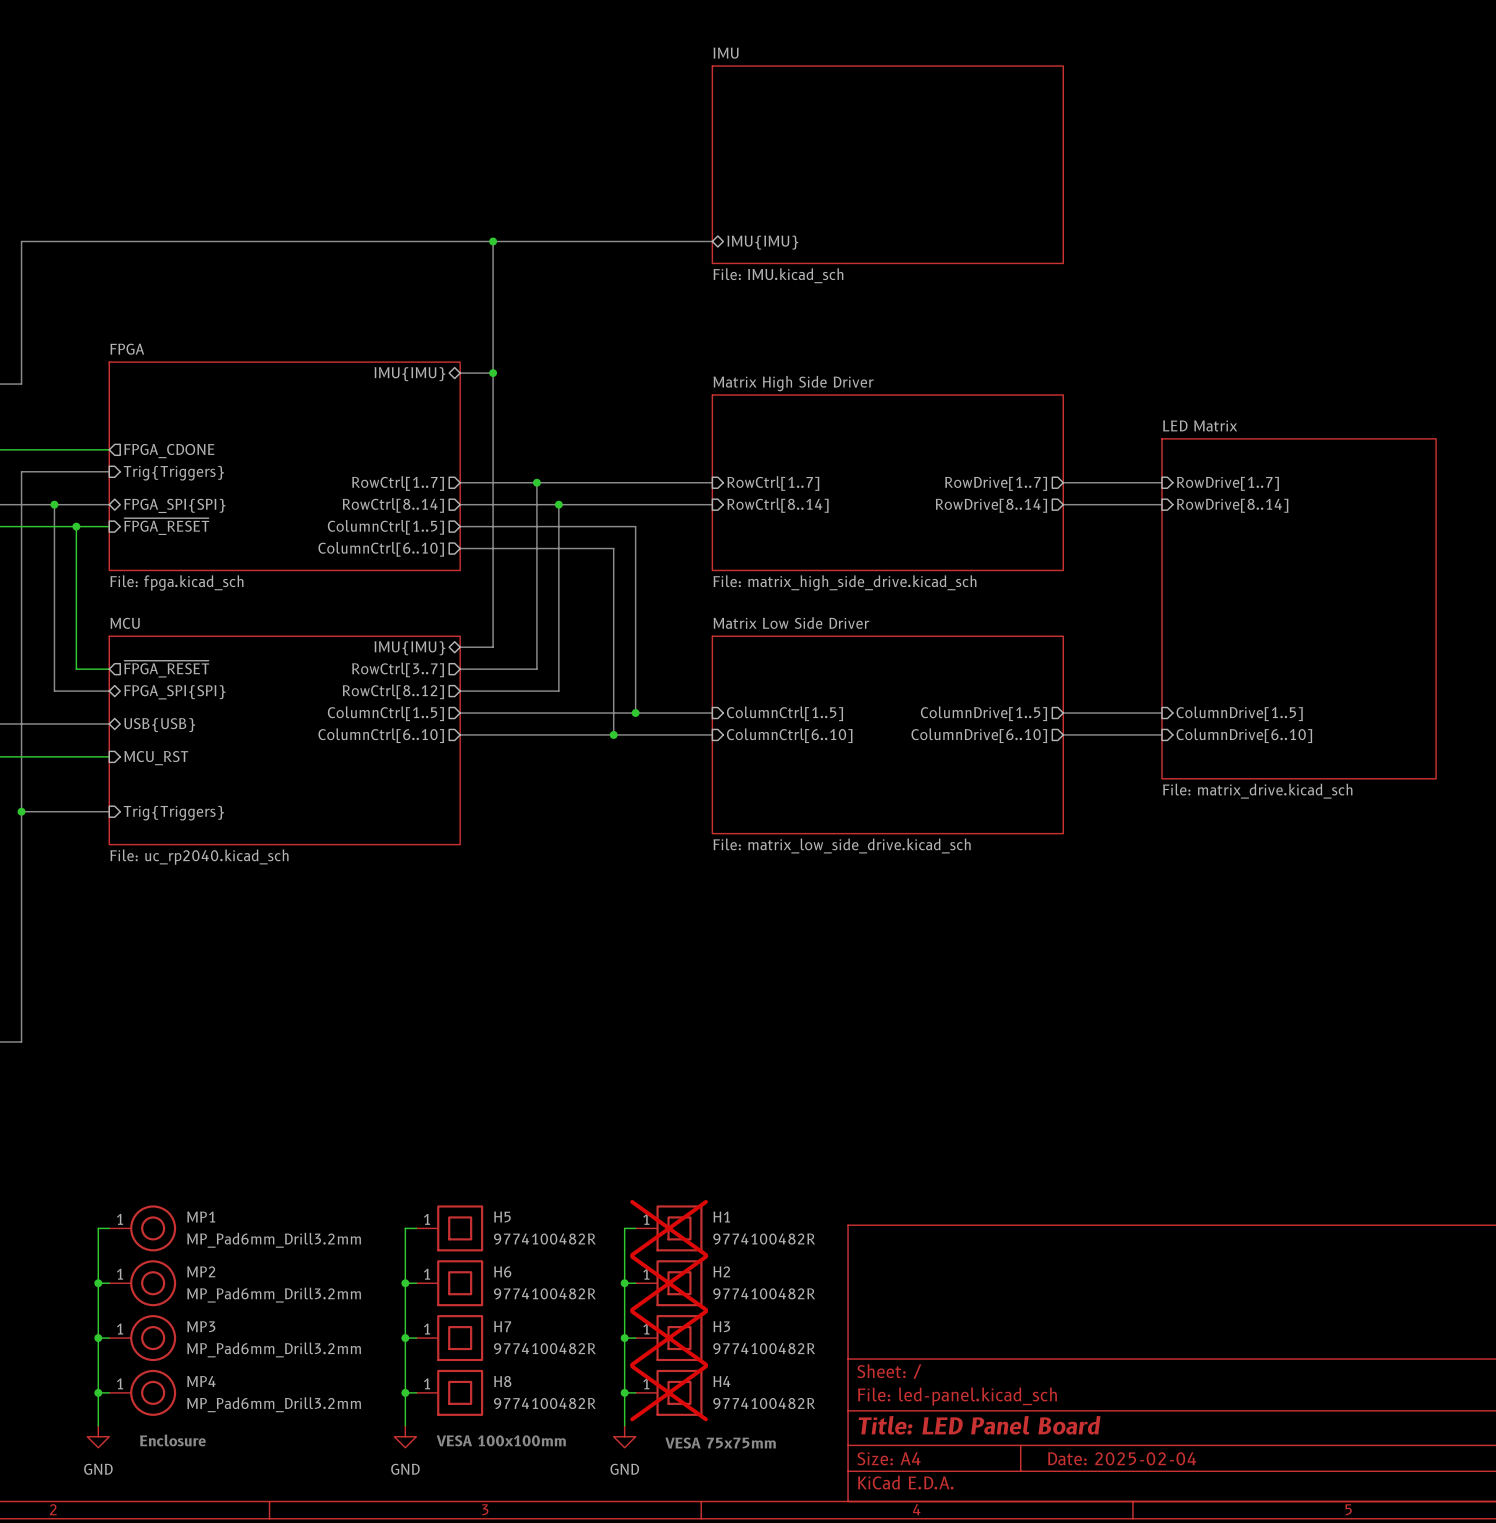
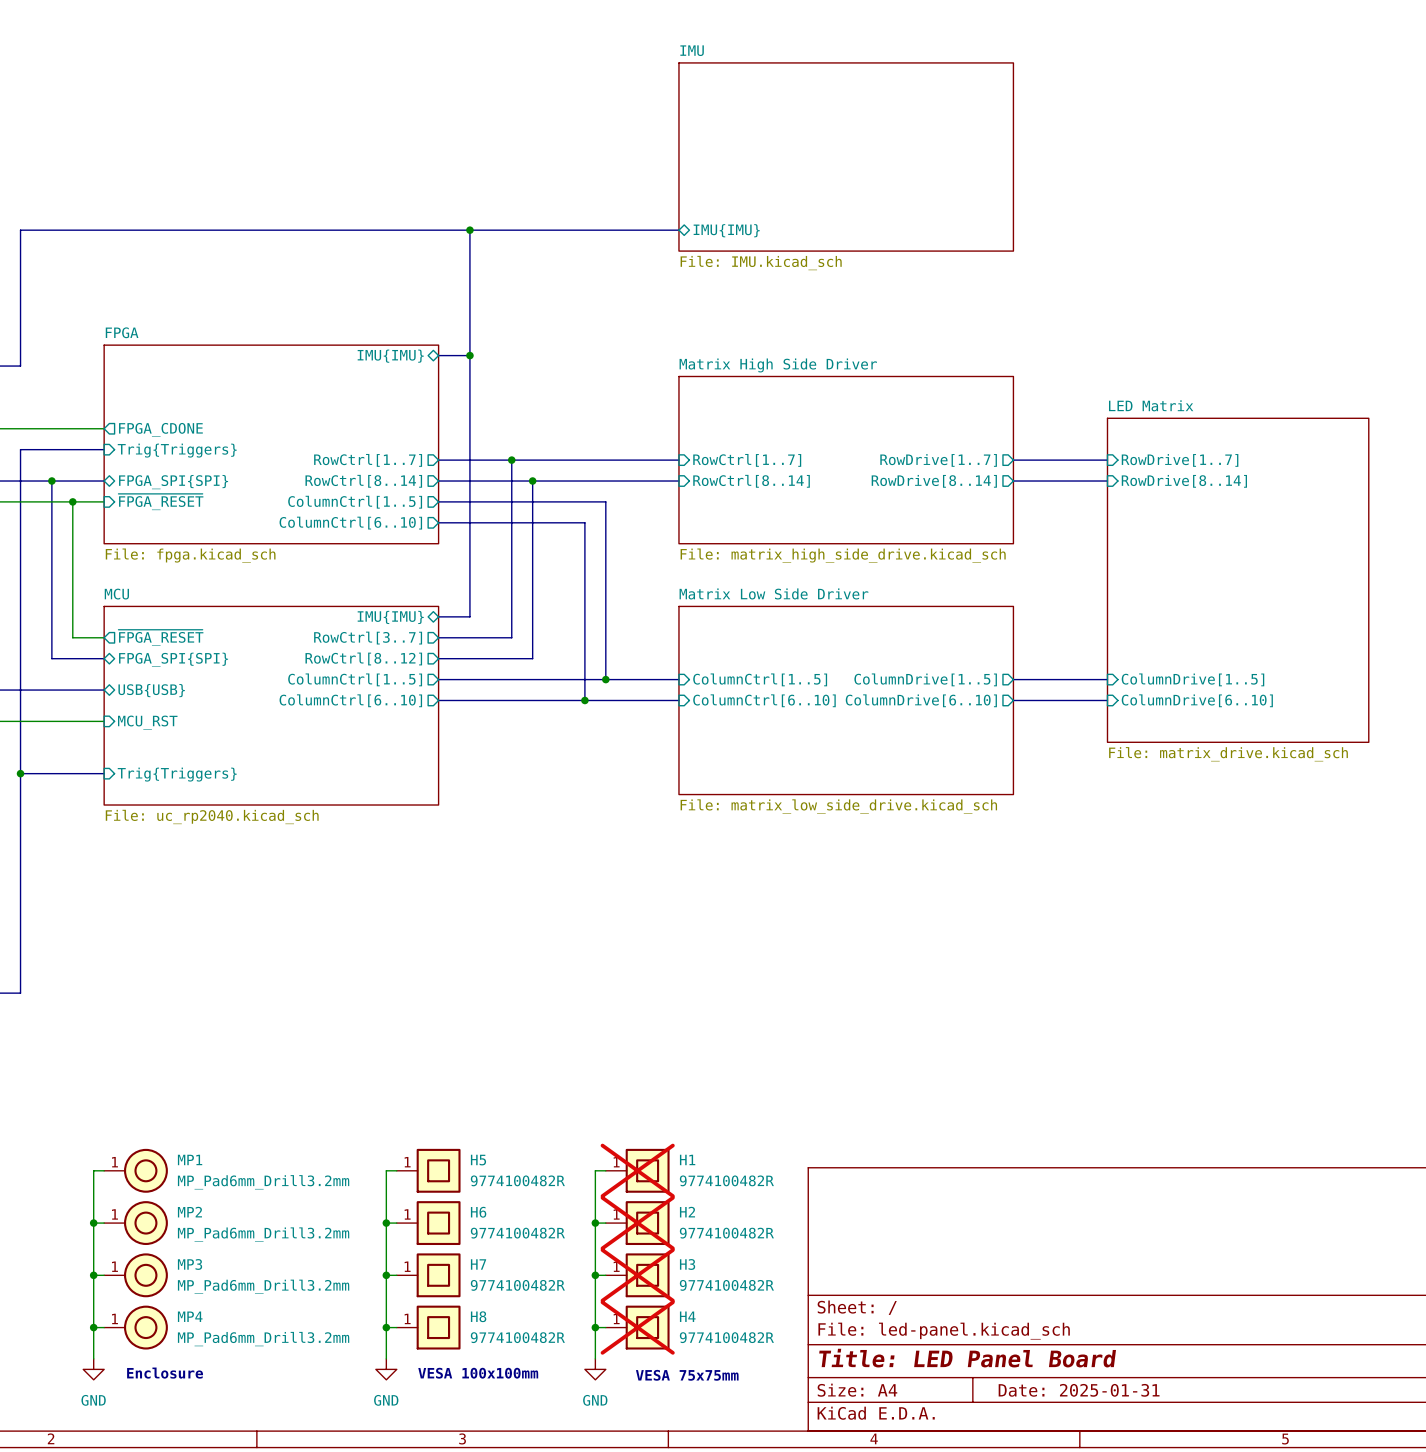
title block: Date: 2025-02-04 (1122, 1458) -> Date: 2025-01-31 (1079, 1390)

